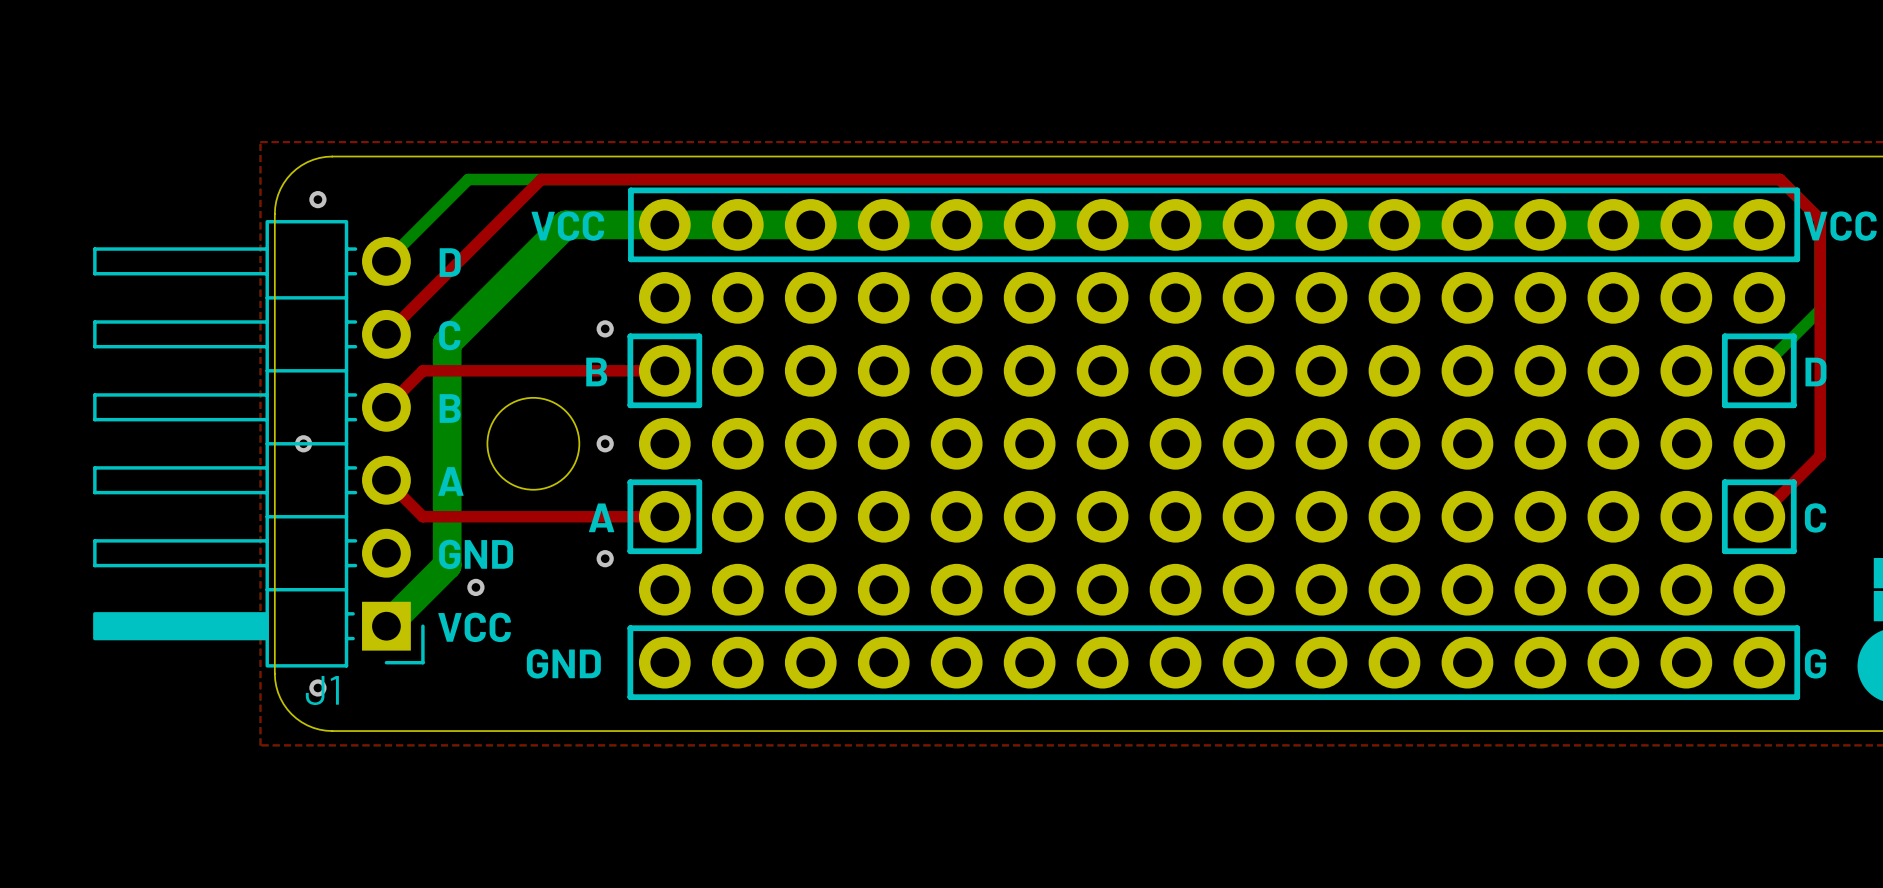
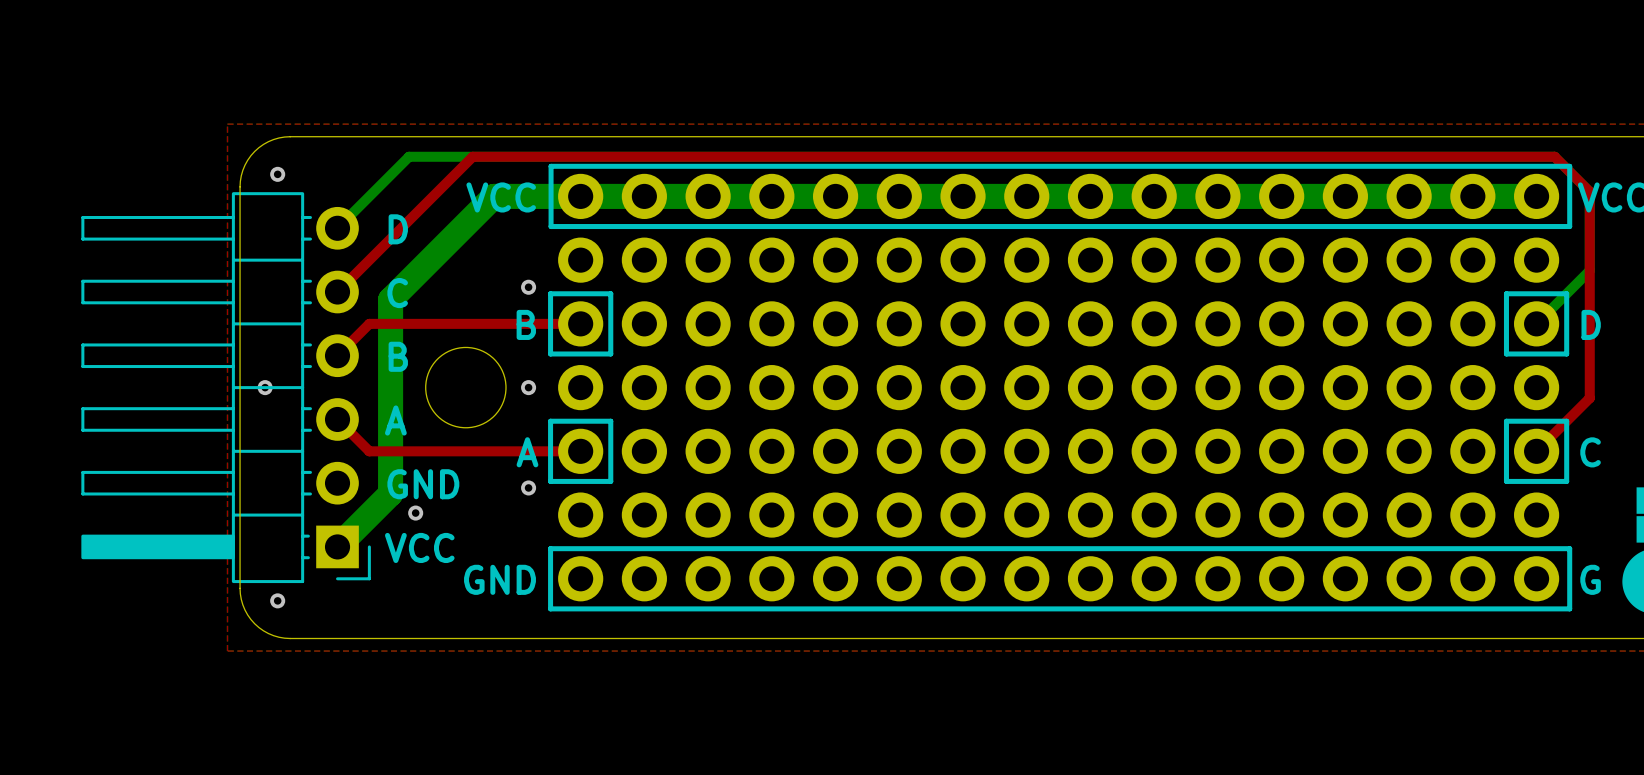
J1 name: J1 (322, 690) -> none

